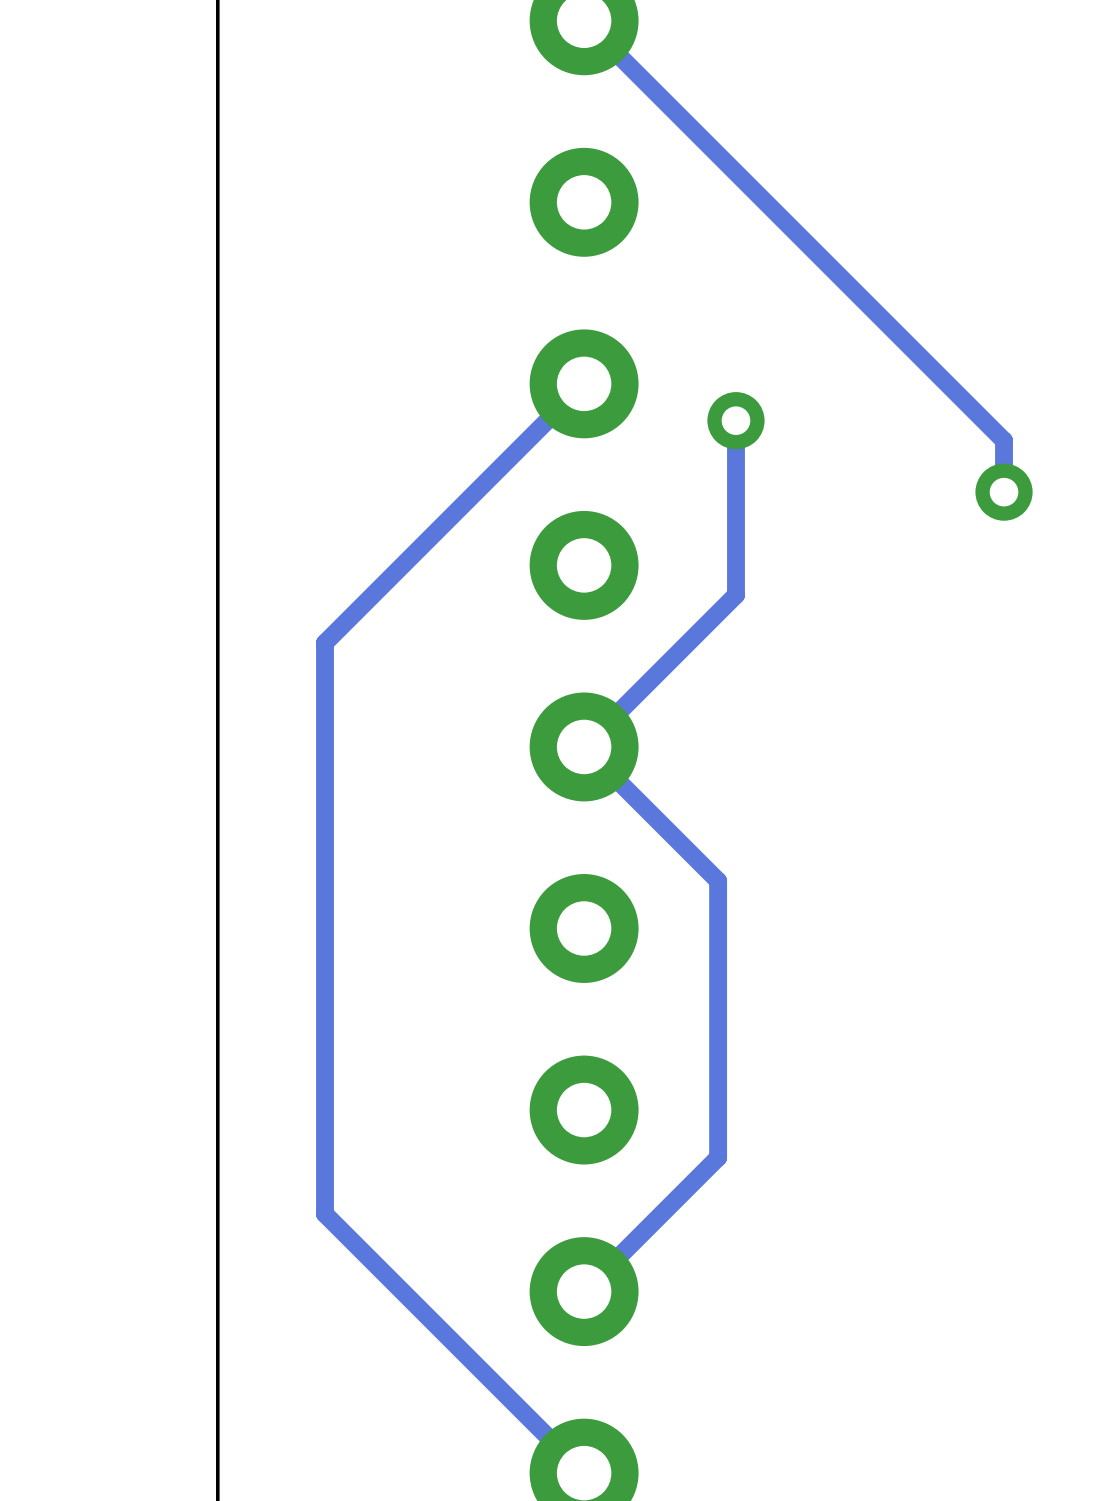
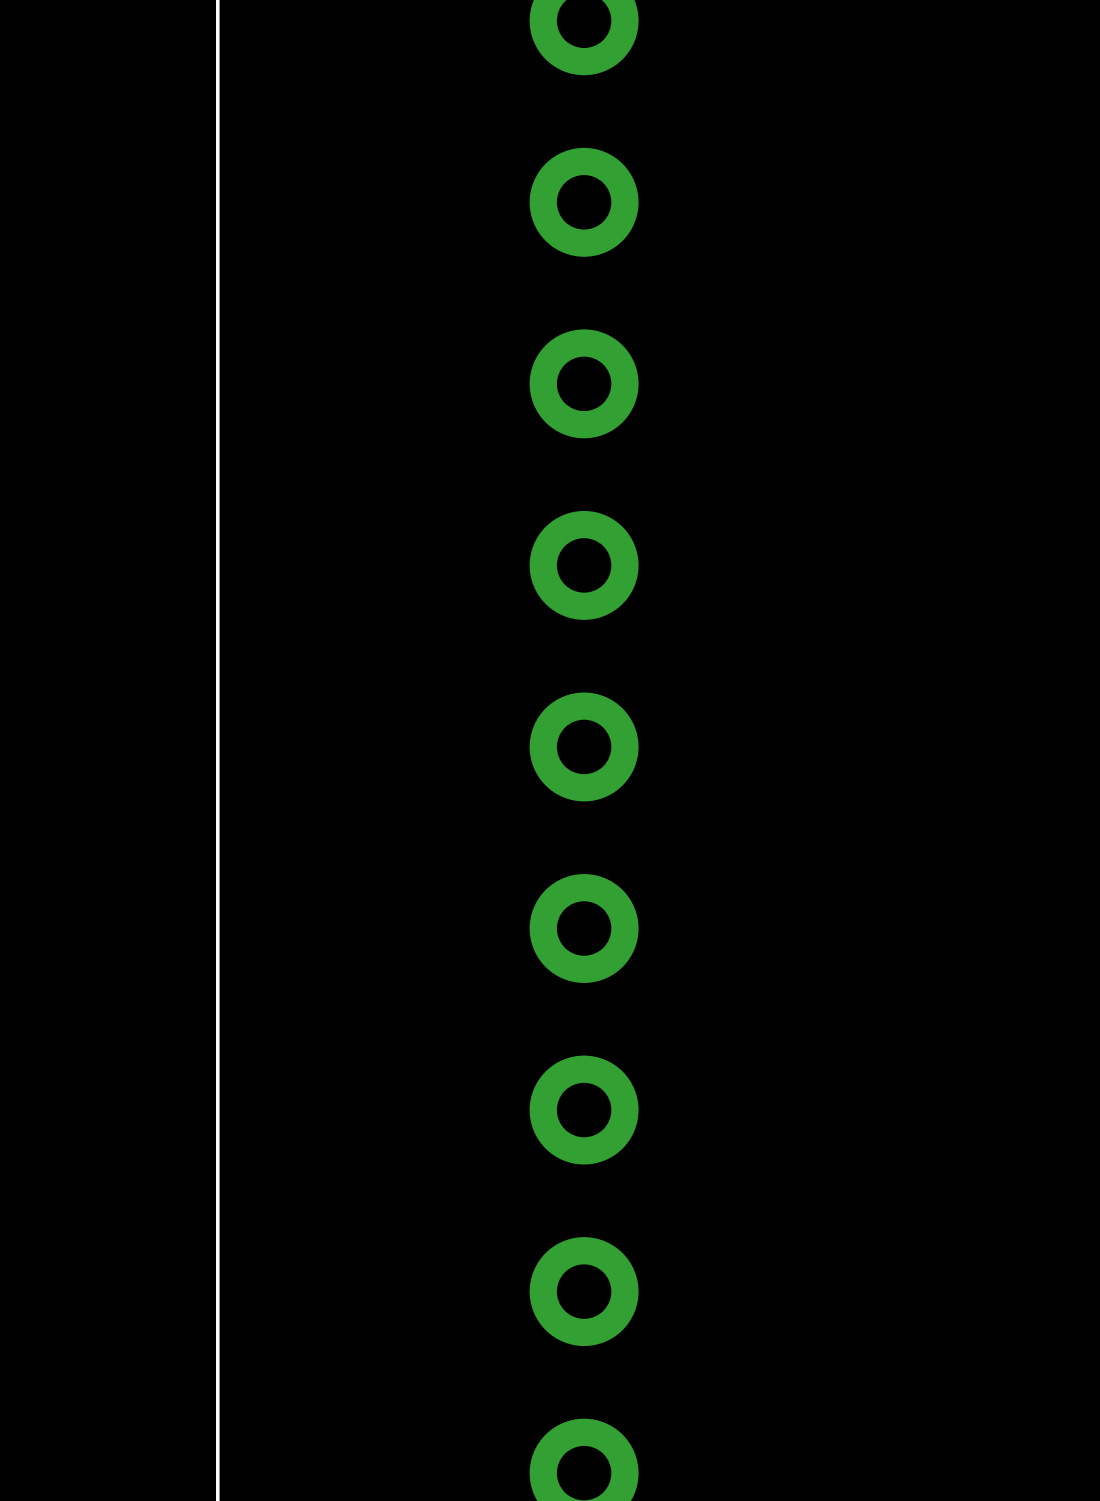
track: (584, 20) (1004, 440) (1004, 492) -> none
track: (584, 383) (325, 642) (325, 1214) (584, 1473) -> none
track: (735, 420) (735, 595) (584, 746) (718, 880) (718, 1157) (584, 1291) -> none
via: (735, 420) -> none
via: (1004, 492) -> none

